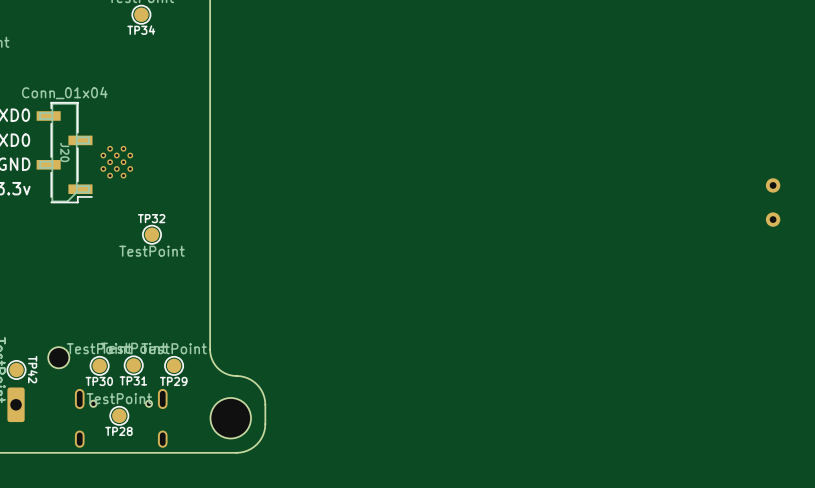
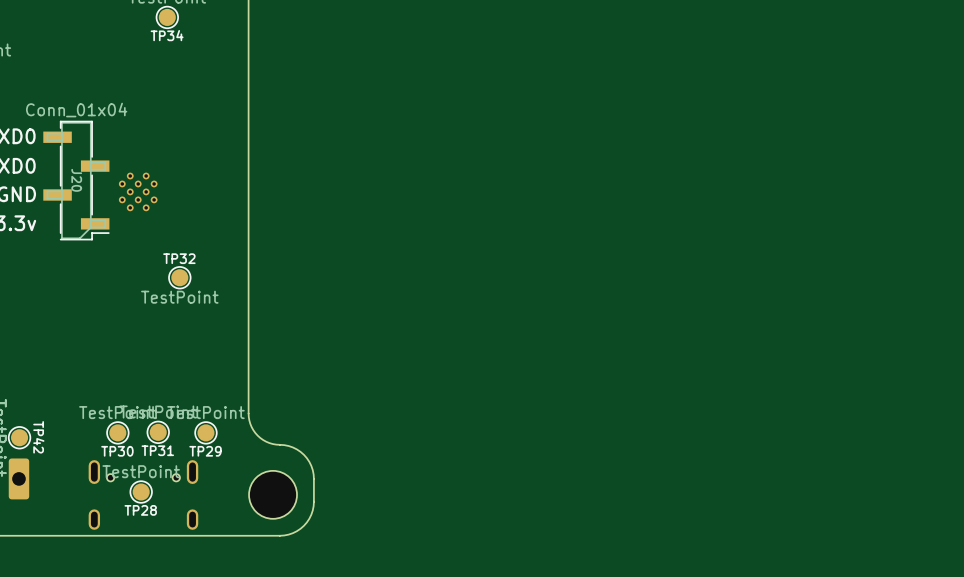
part: (773, 185) -> none
part: (773, 219) -> none
part: (58, 357) -> none

